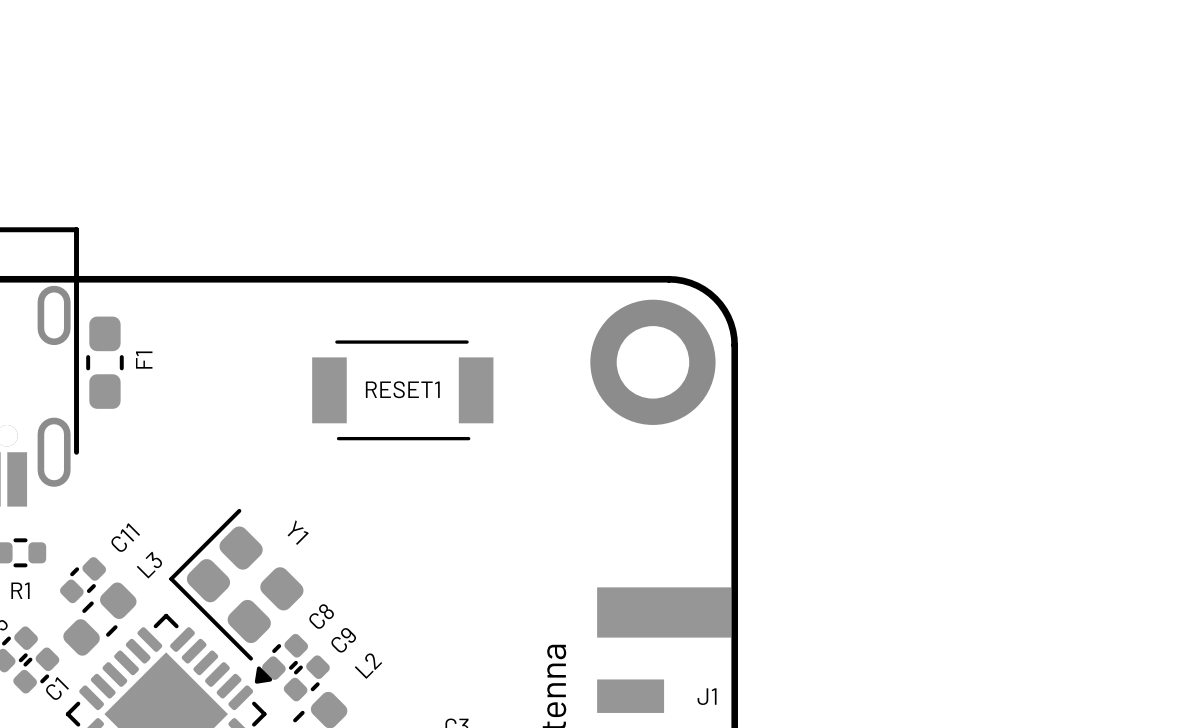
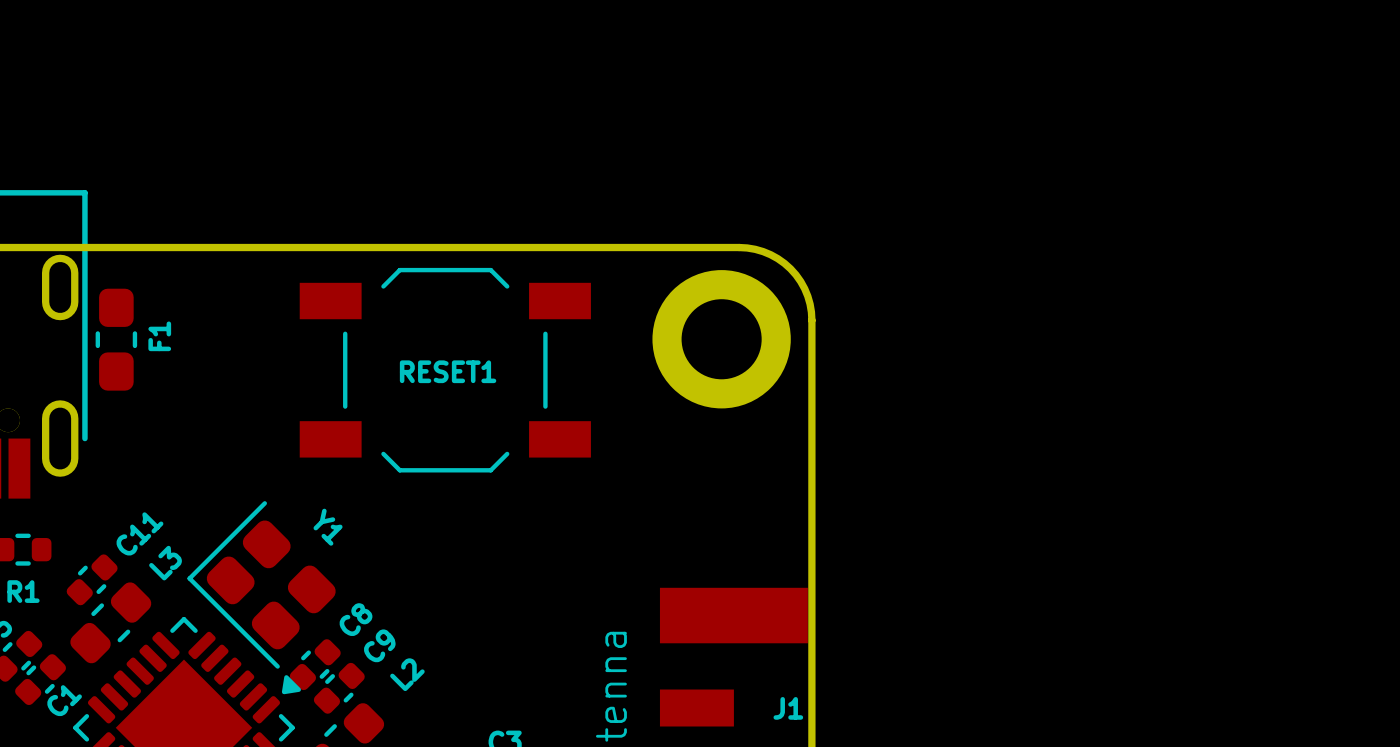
RESET1 footprint: [312, 340, 494, 441] -> [299, 267, 591, 473]

